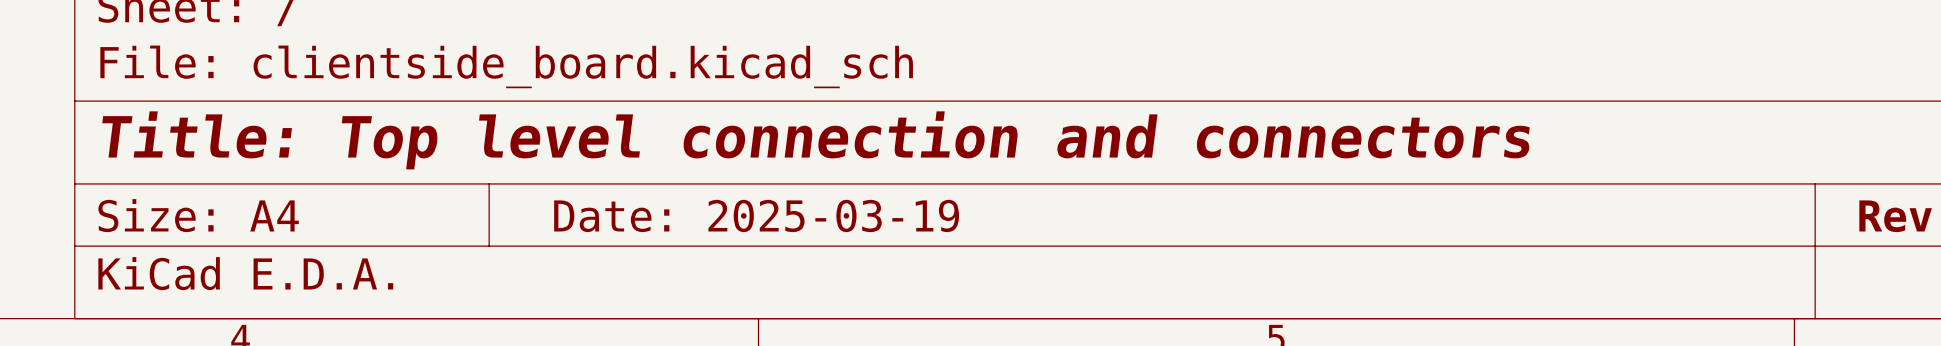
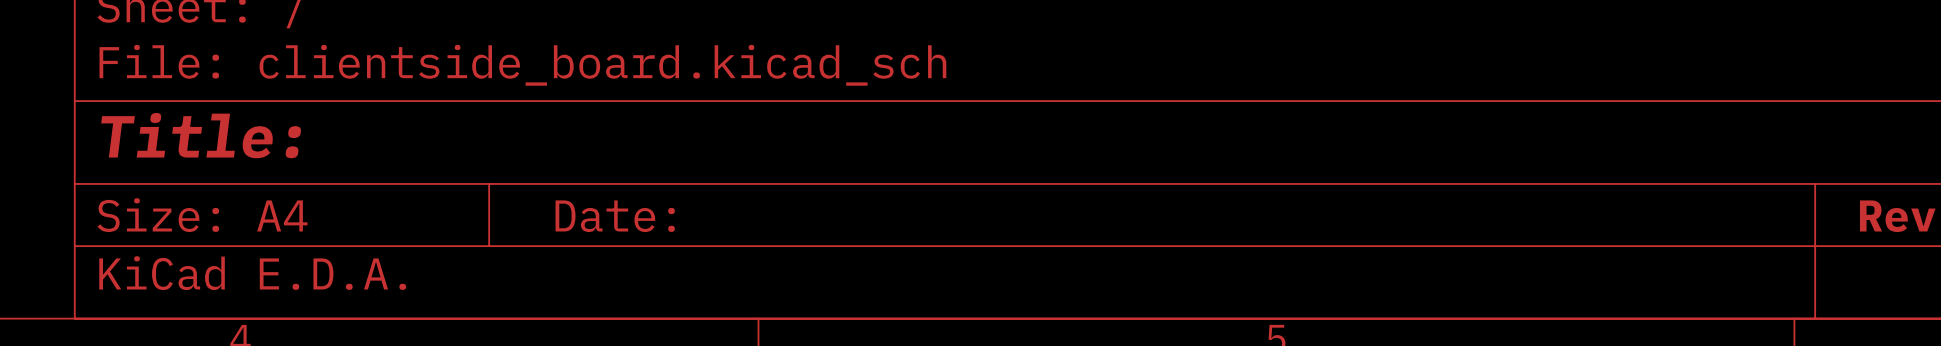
title block: Title: Top level connection and connectors (816, 140) -> Title: (201, 135)
title block: Date: 2025-03-19 (756, 215) -> Date: (615, 216)

